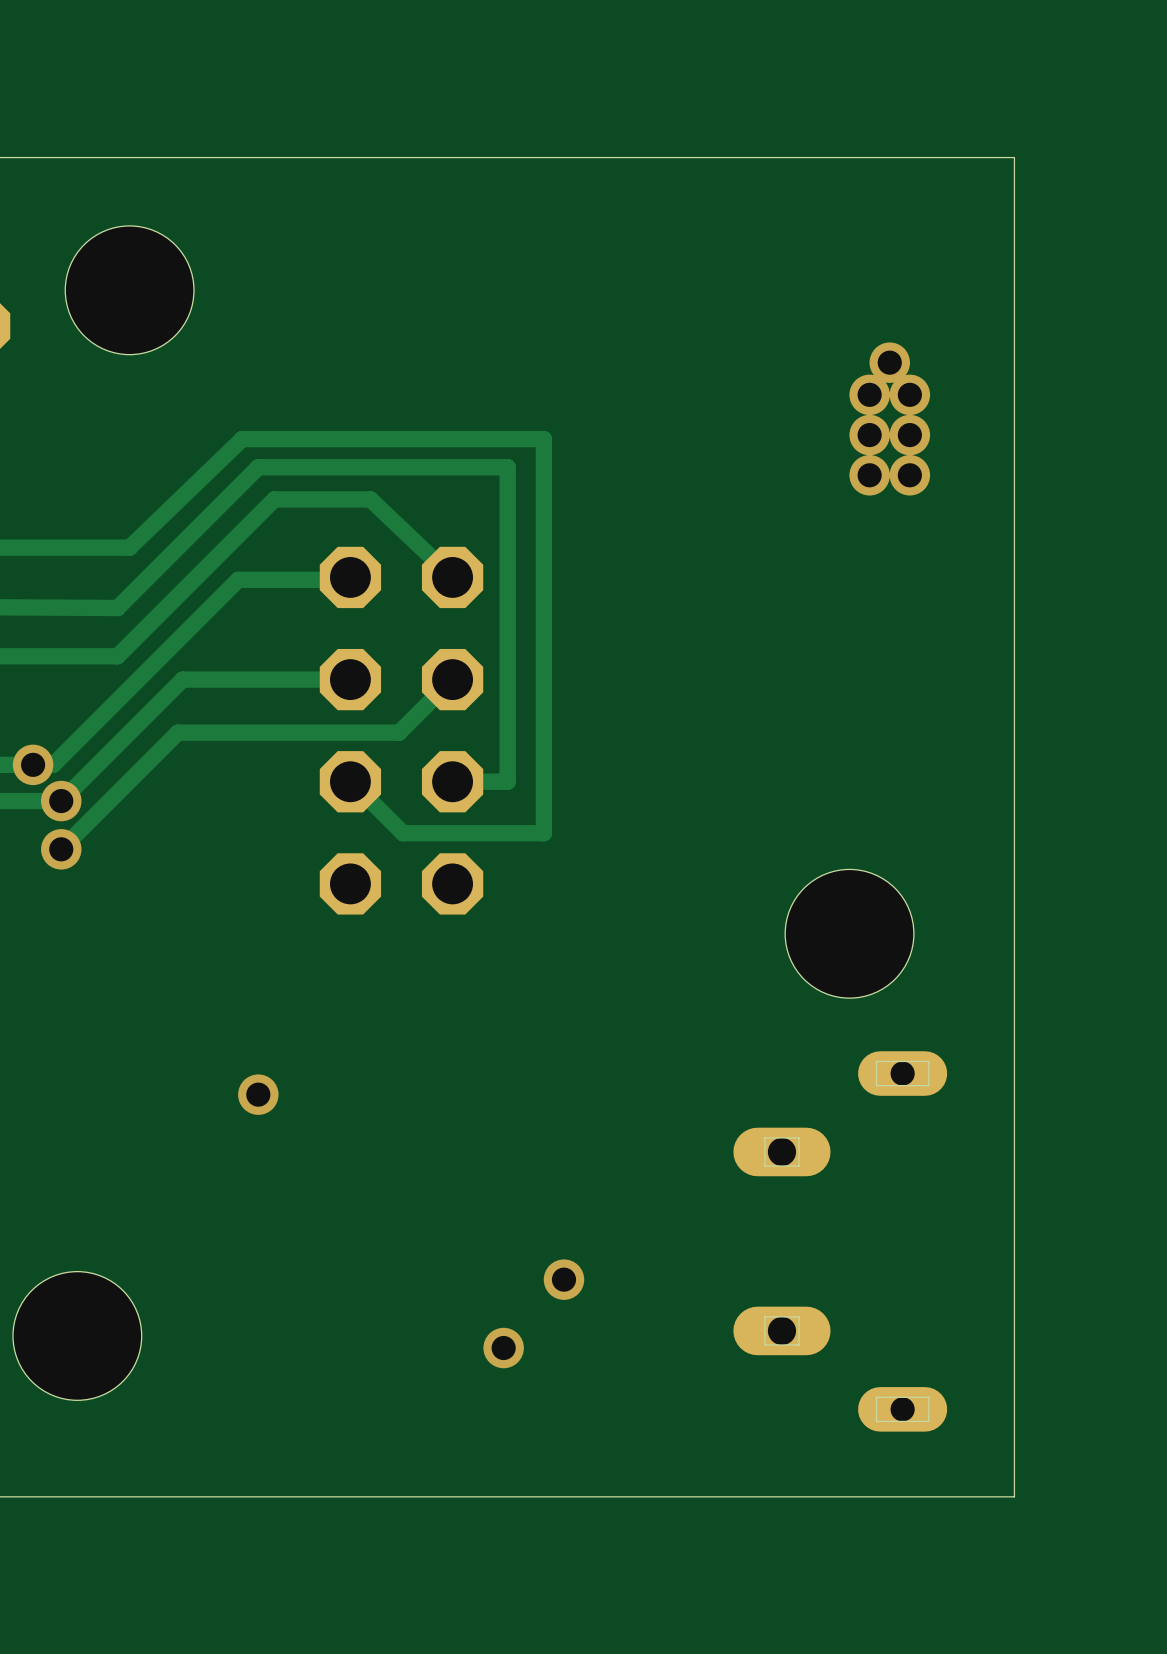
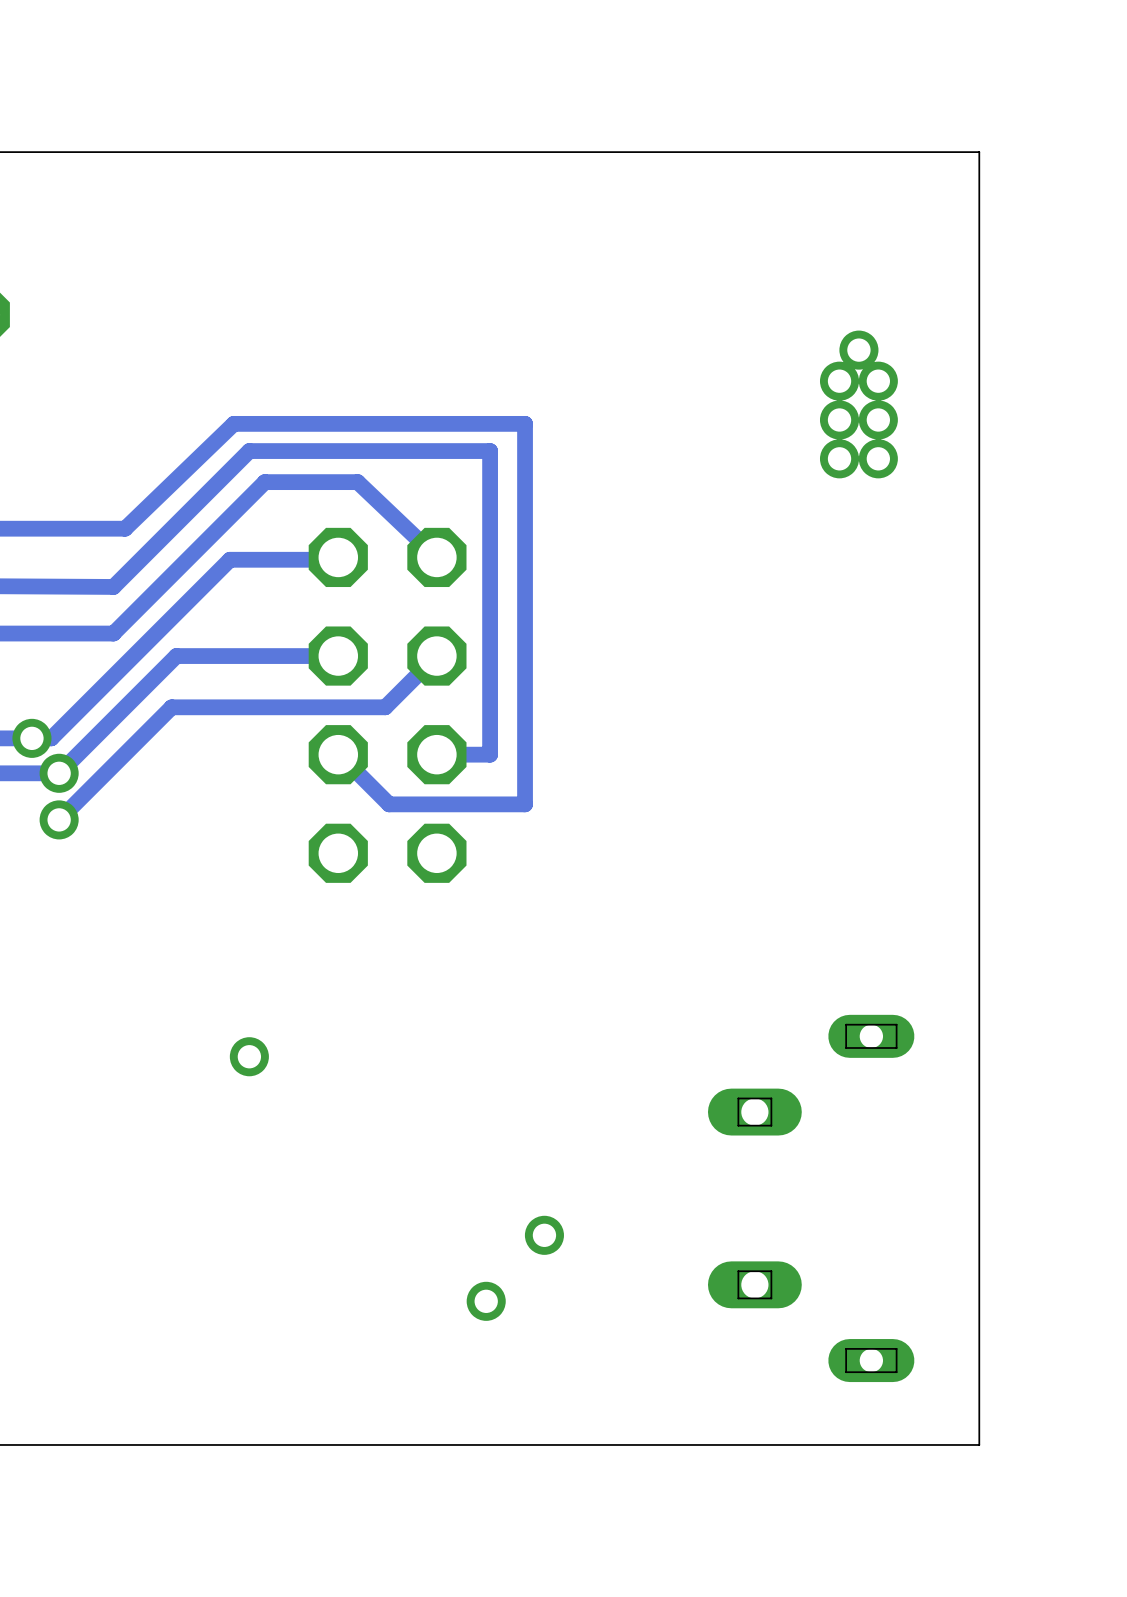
hole: (129, 290) -> none
hole: (849, 933) -> none
hole: (77, 1335) -> none

